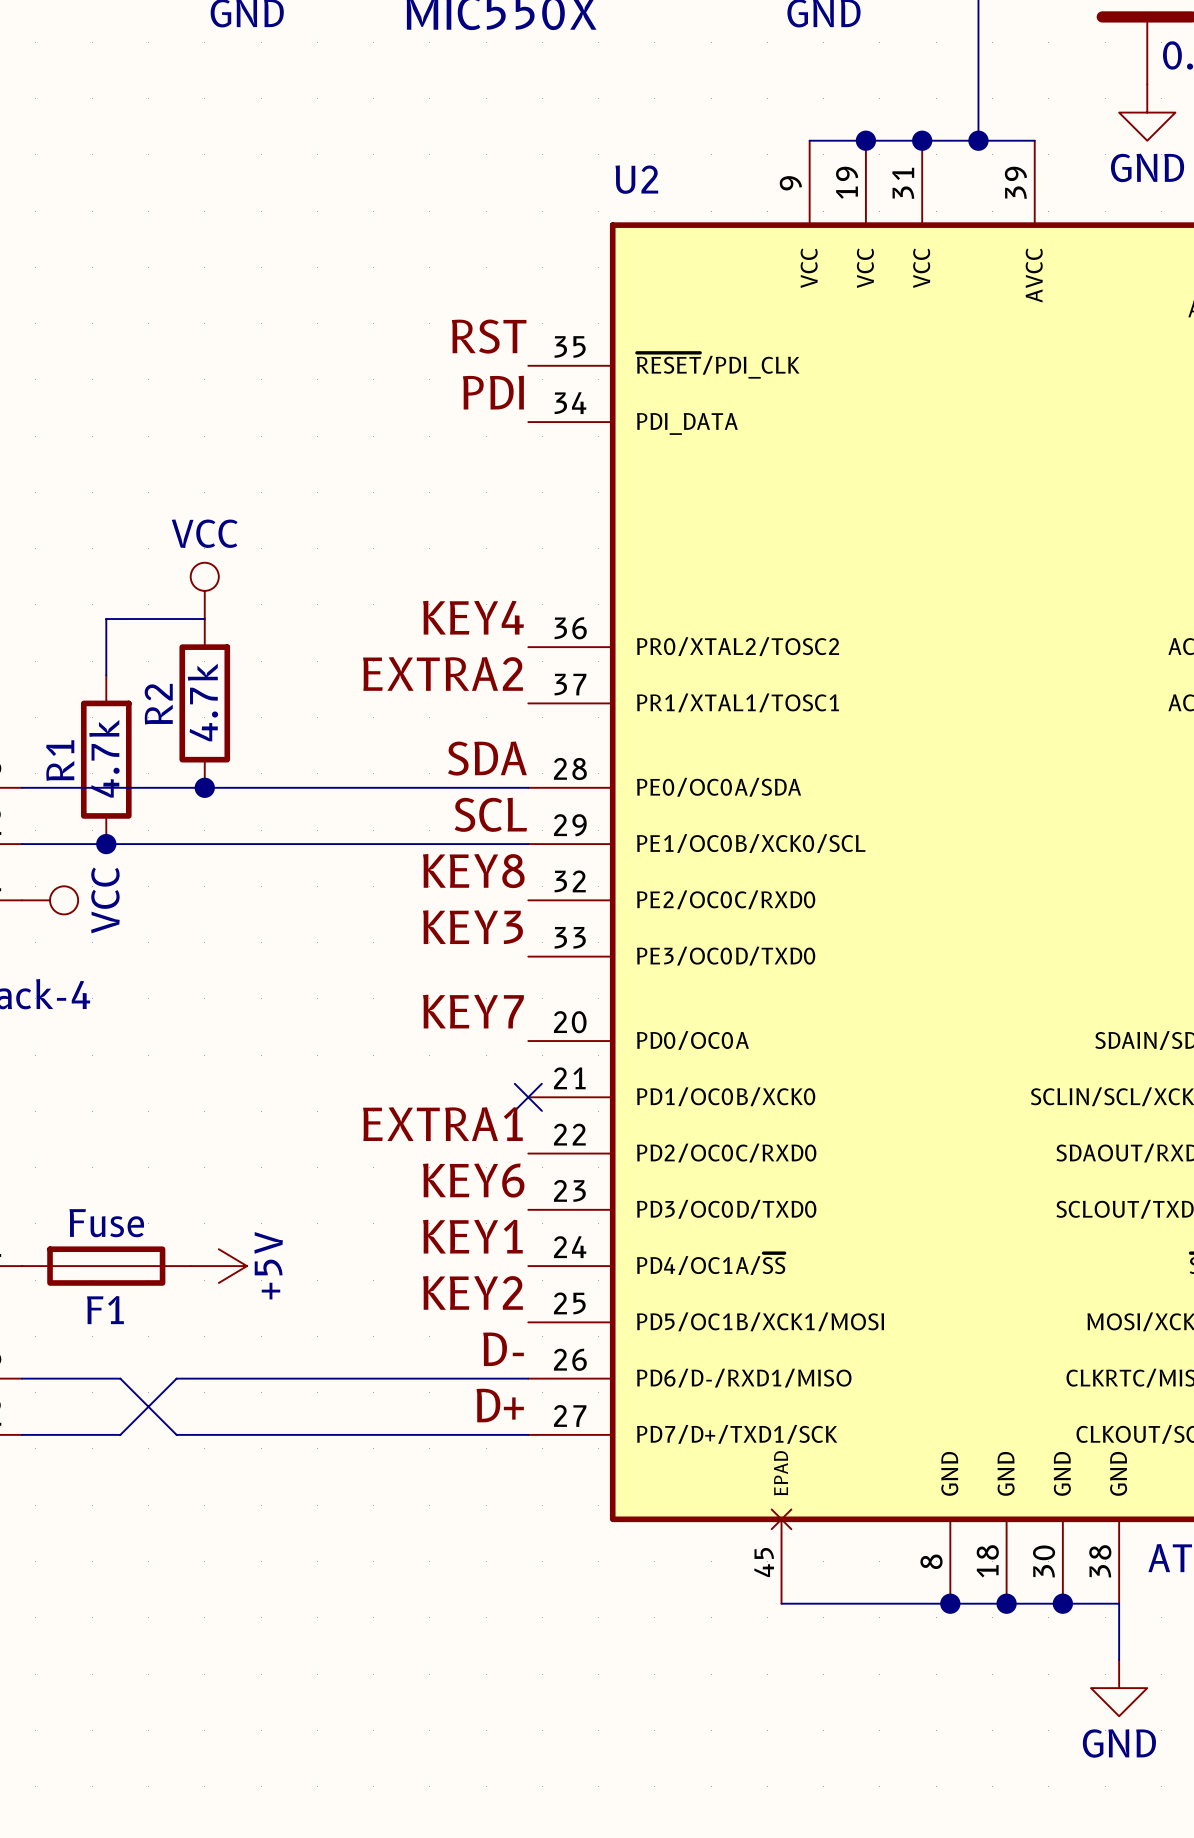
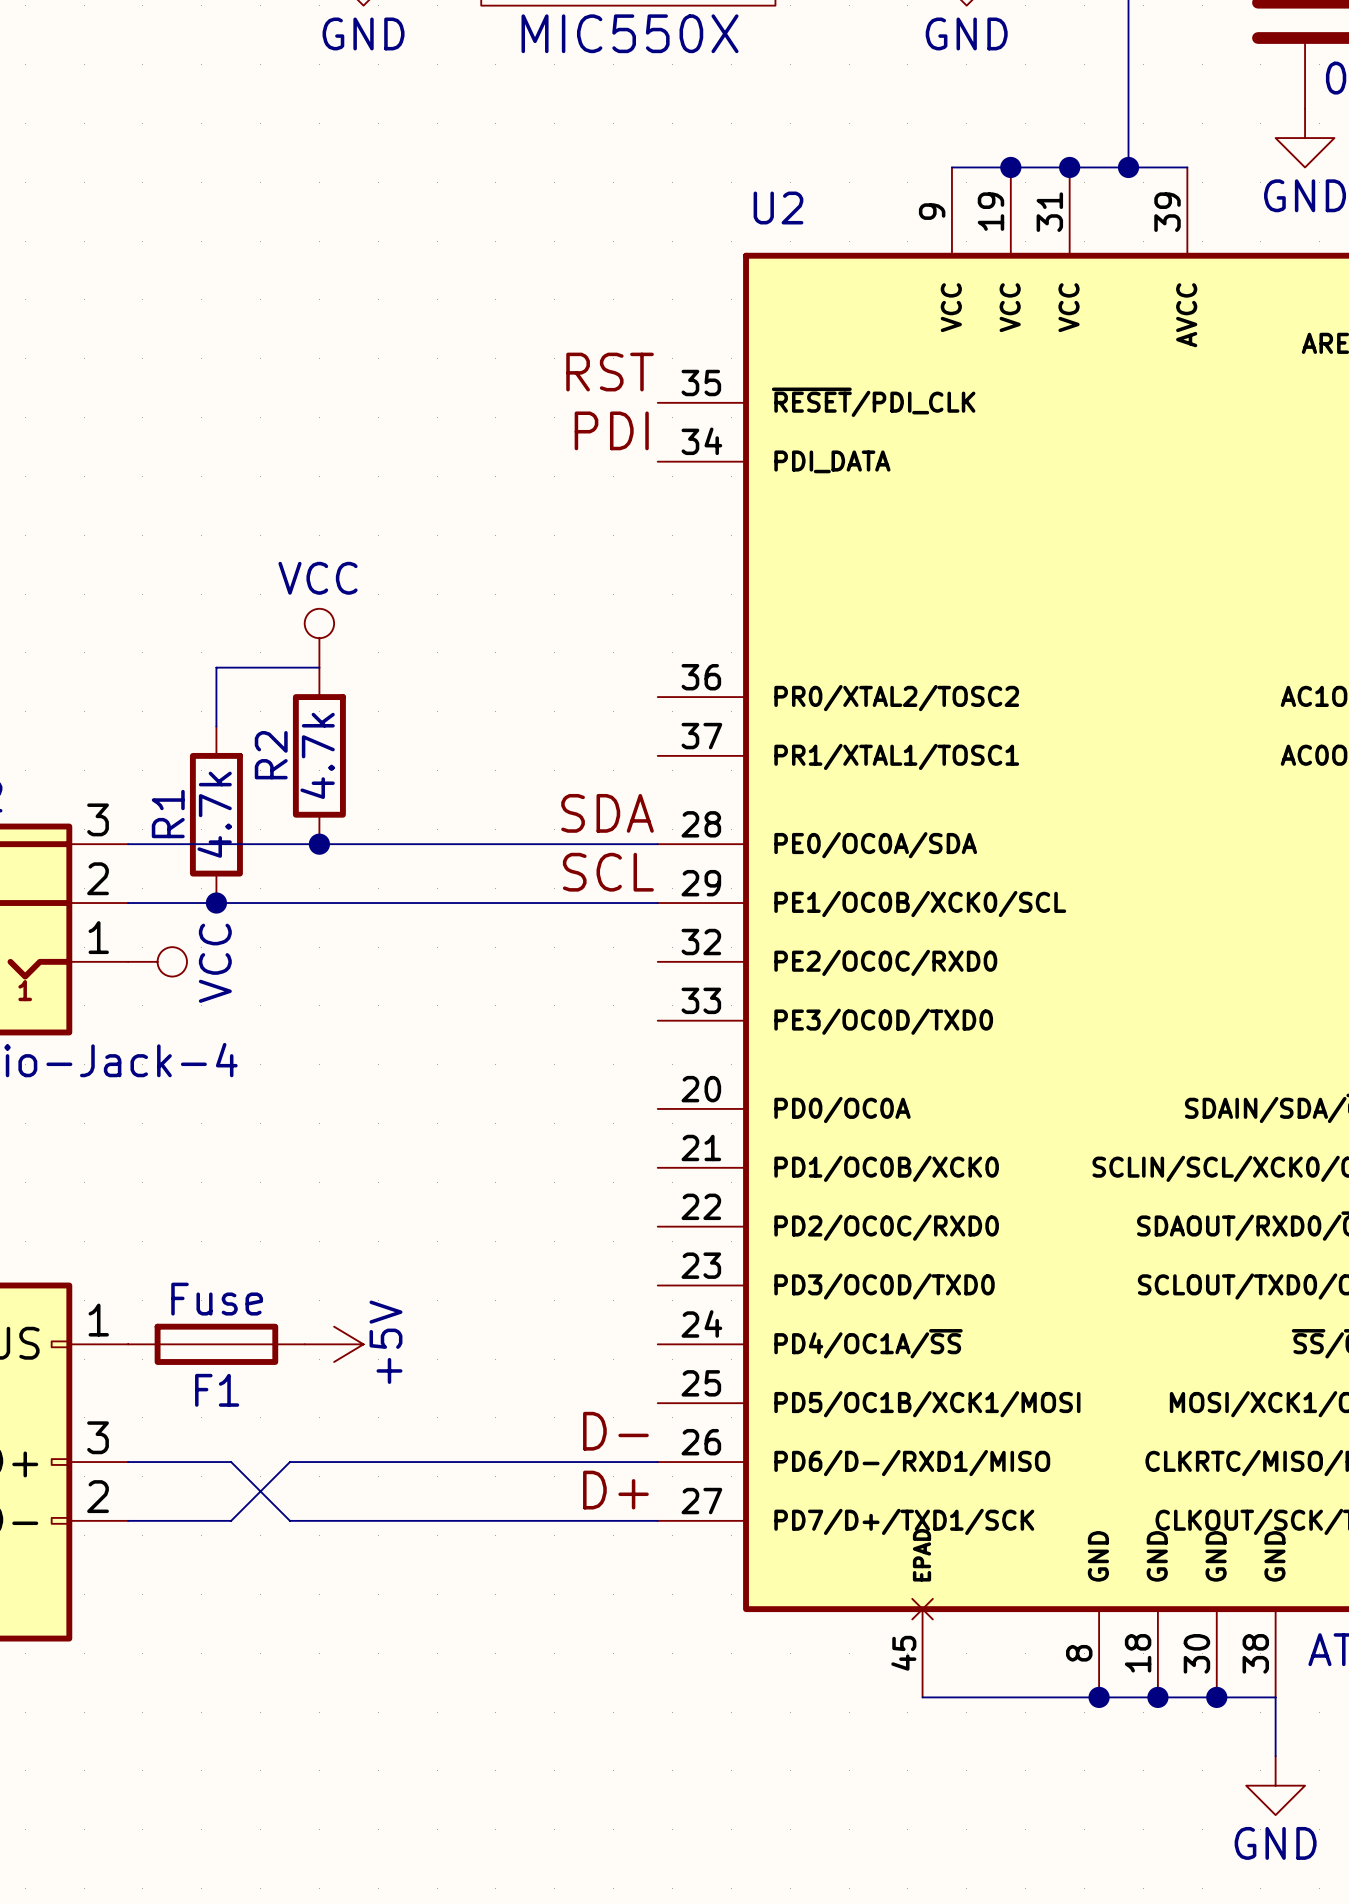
label: KEY4 (473, 617) -> none
label: EXTRA2 (442, 673) -> none
label: KEY8 (473, 871) -> none
label: KEY3 (472, 927) -> none
label: KEY7 (473, 1011) -> none
no-connect mark: (528, 1097) -> none
label: EXTRA1 (442, 1124) -> none
label: KEY6 (473, 1180) -> none
label: KEY1 (472, 1236) -> none
label: KEY2 (472, 1292) -> none

